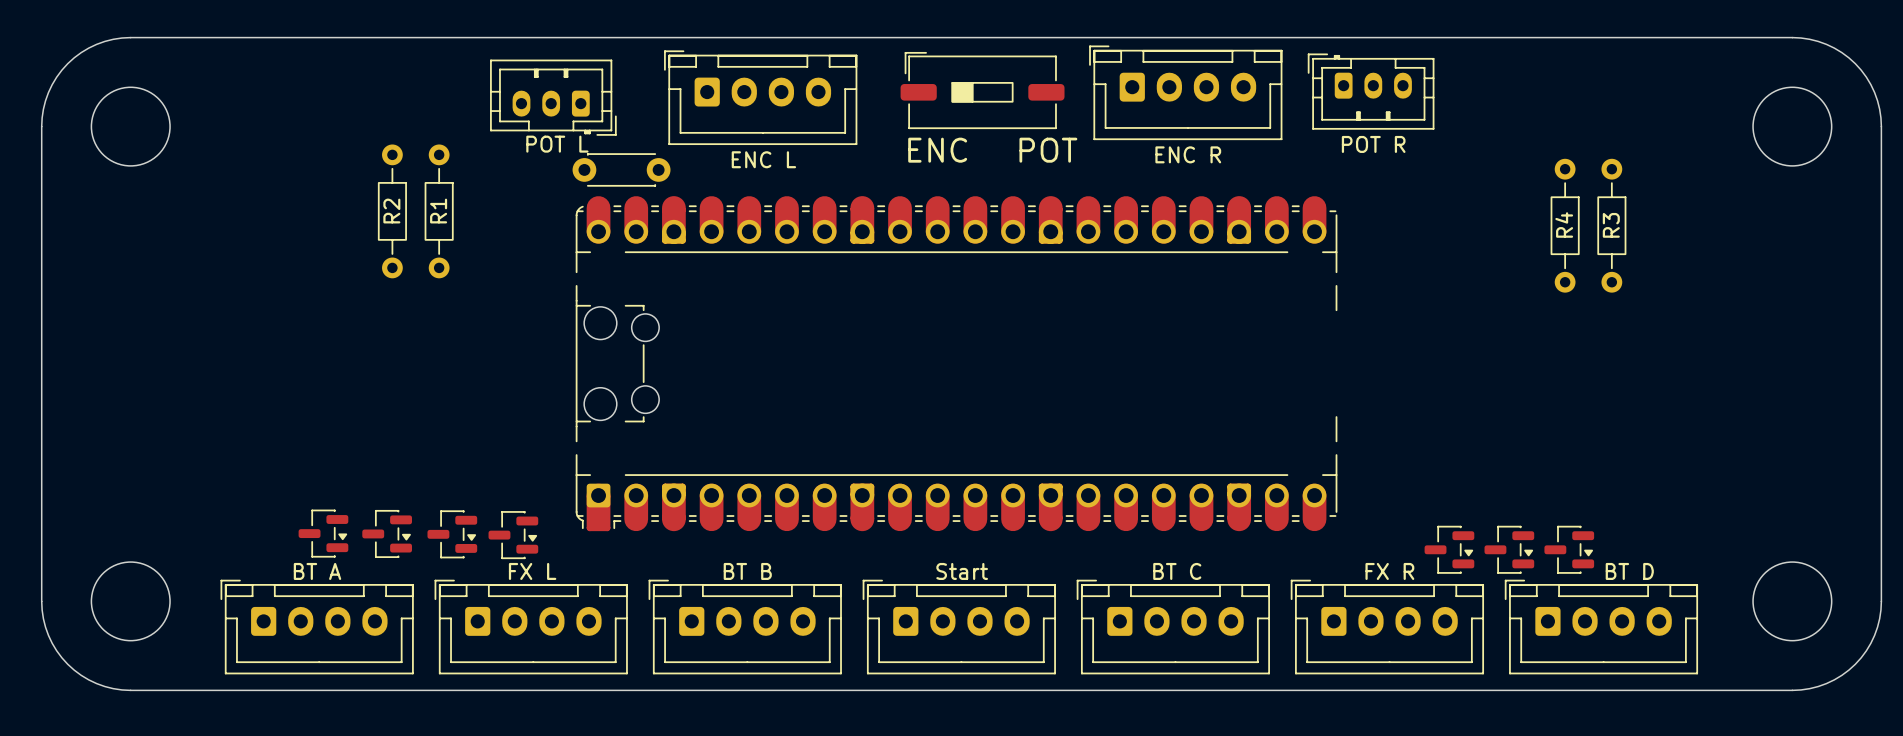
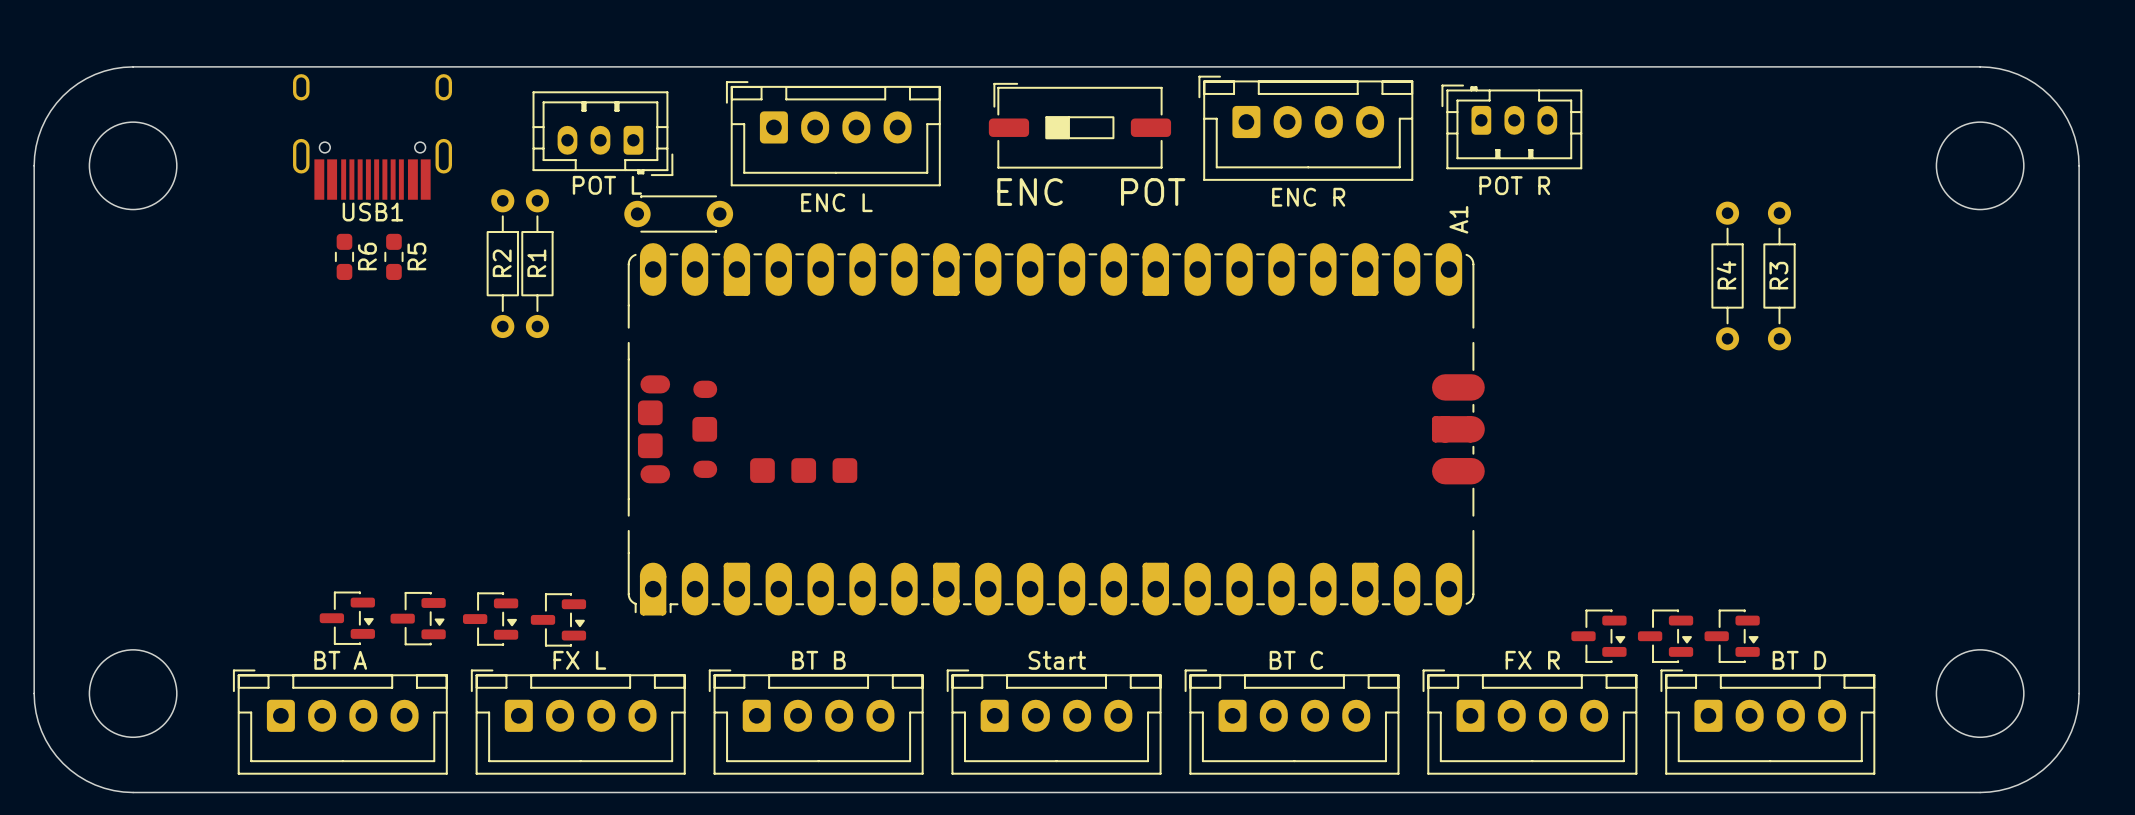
USB1: none -> (372, 136)
R6: none -> (344, 256)
R5: none -> (393, 256)
R2 position: (392, 211) -> (502, 263)
R1 position: (439, 211) -> (537, 263)
part: (956, 363) -> none
A1: none -> (1056, 429)

